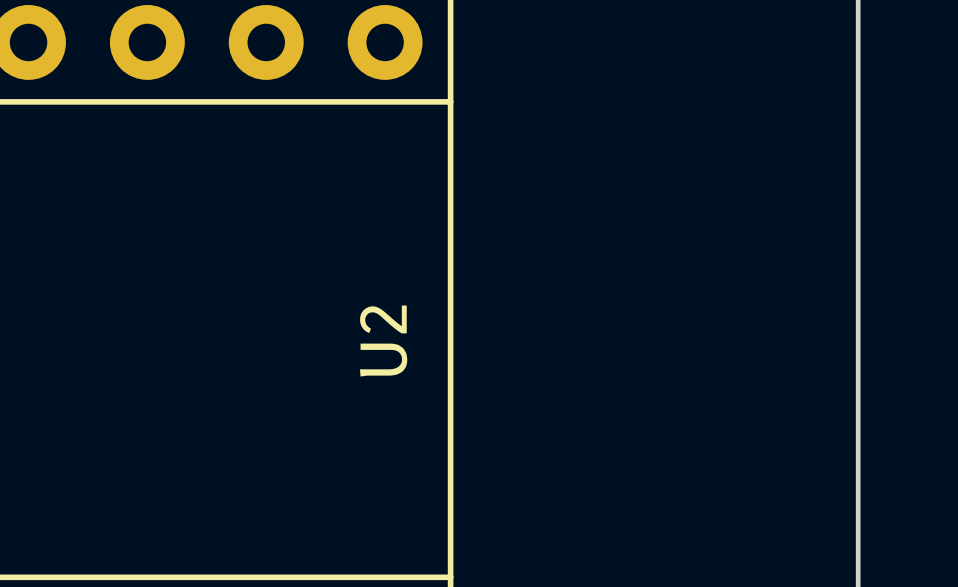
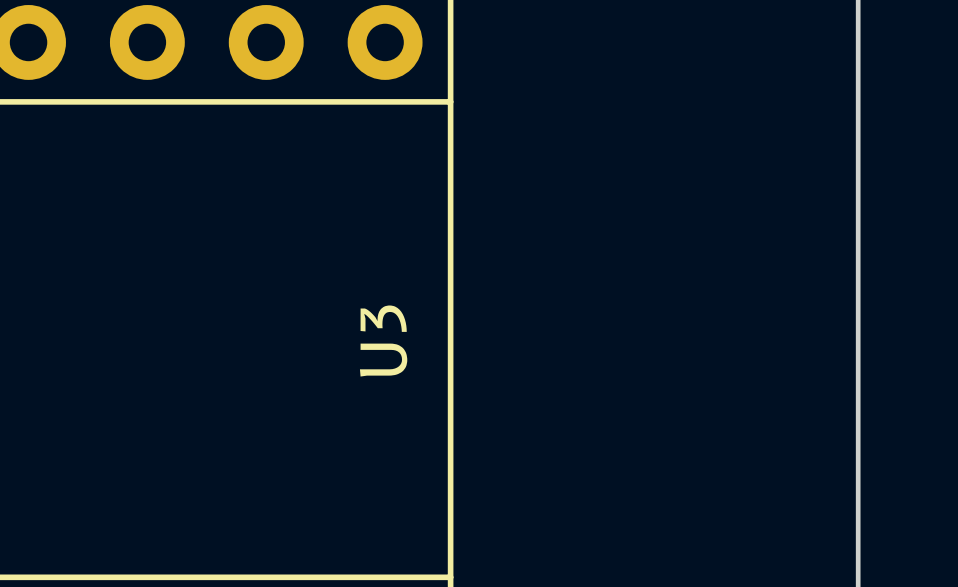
U2 name: U2 (383, 341) -> U3 (383, 341)

